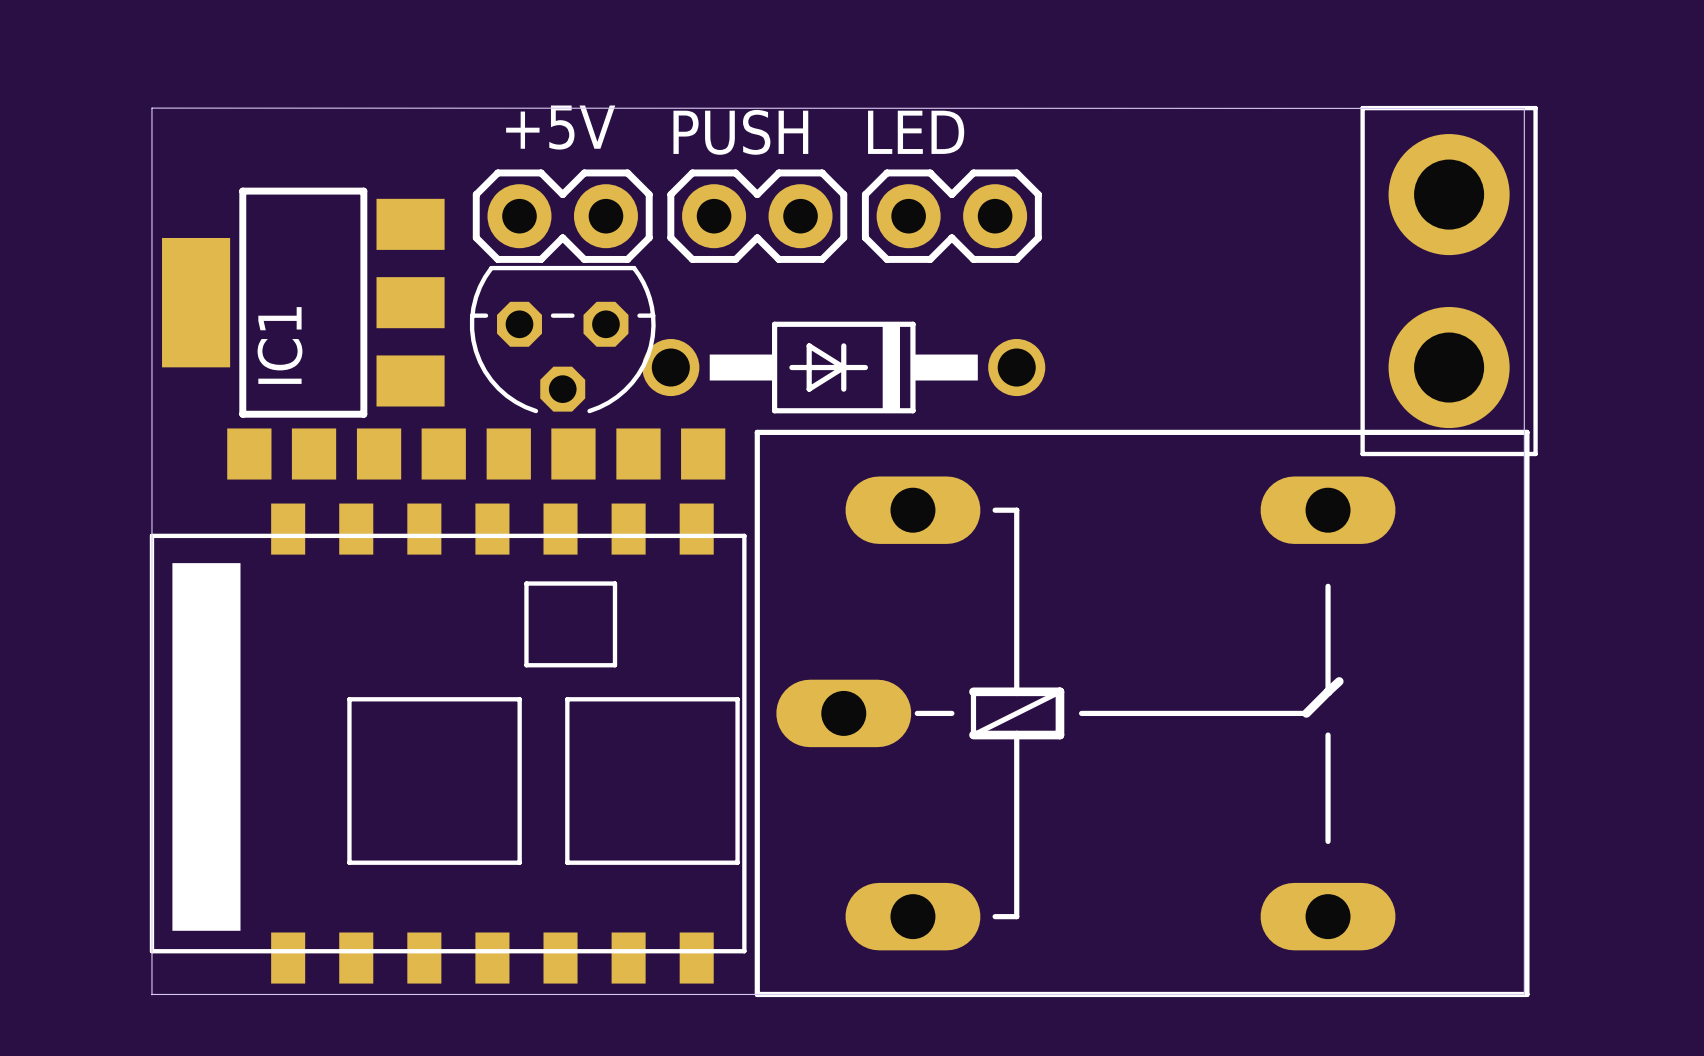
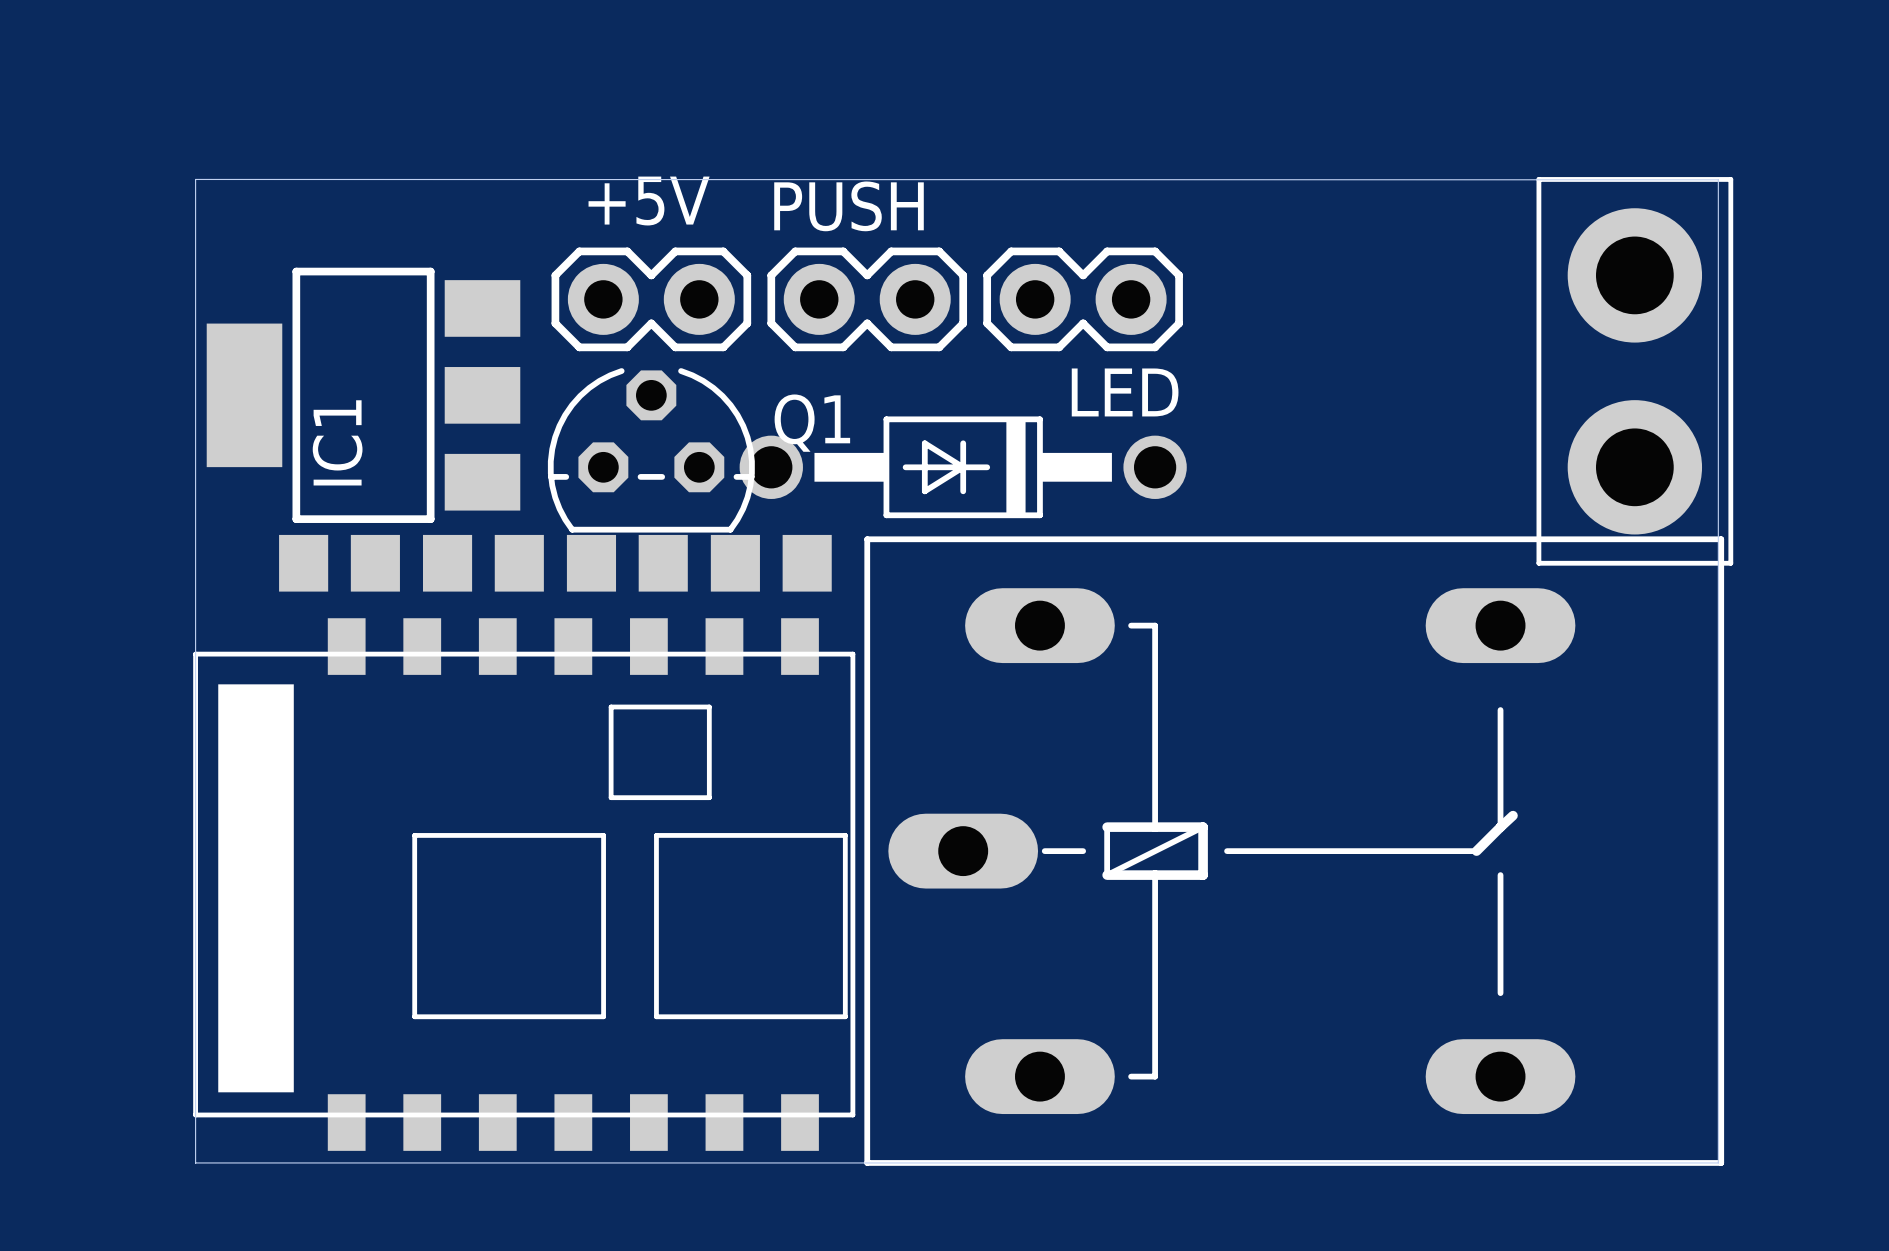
LED name position: LED (916, 132) -> LED (1125, 392)
part: (562, 339) -> none
Q1: none -> (651, 450)

